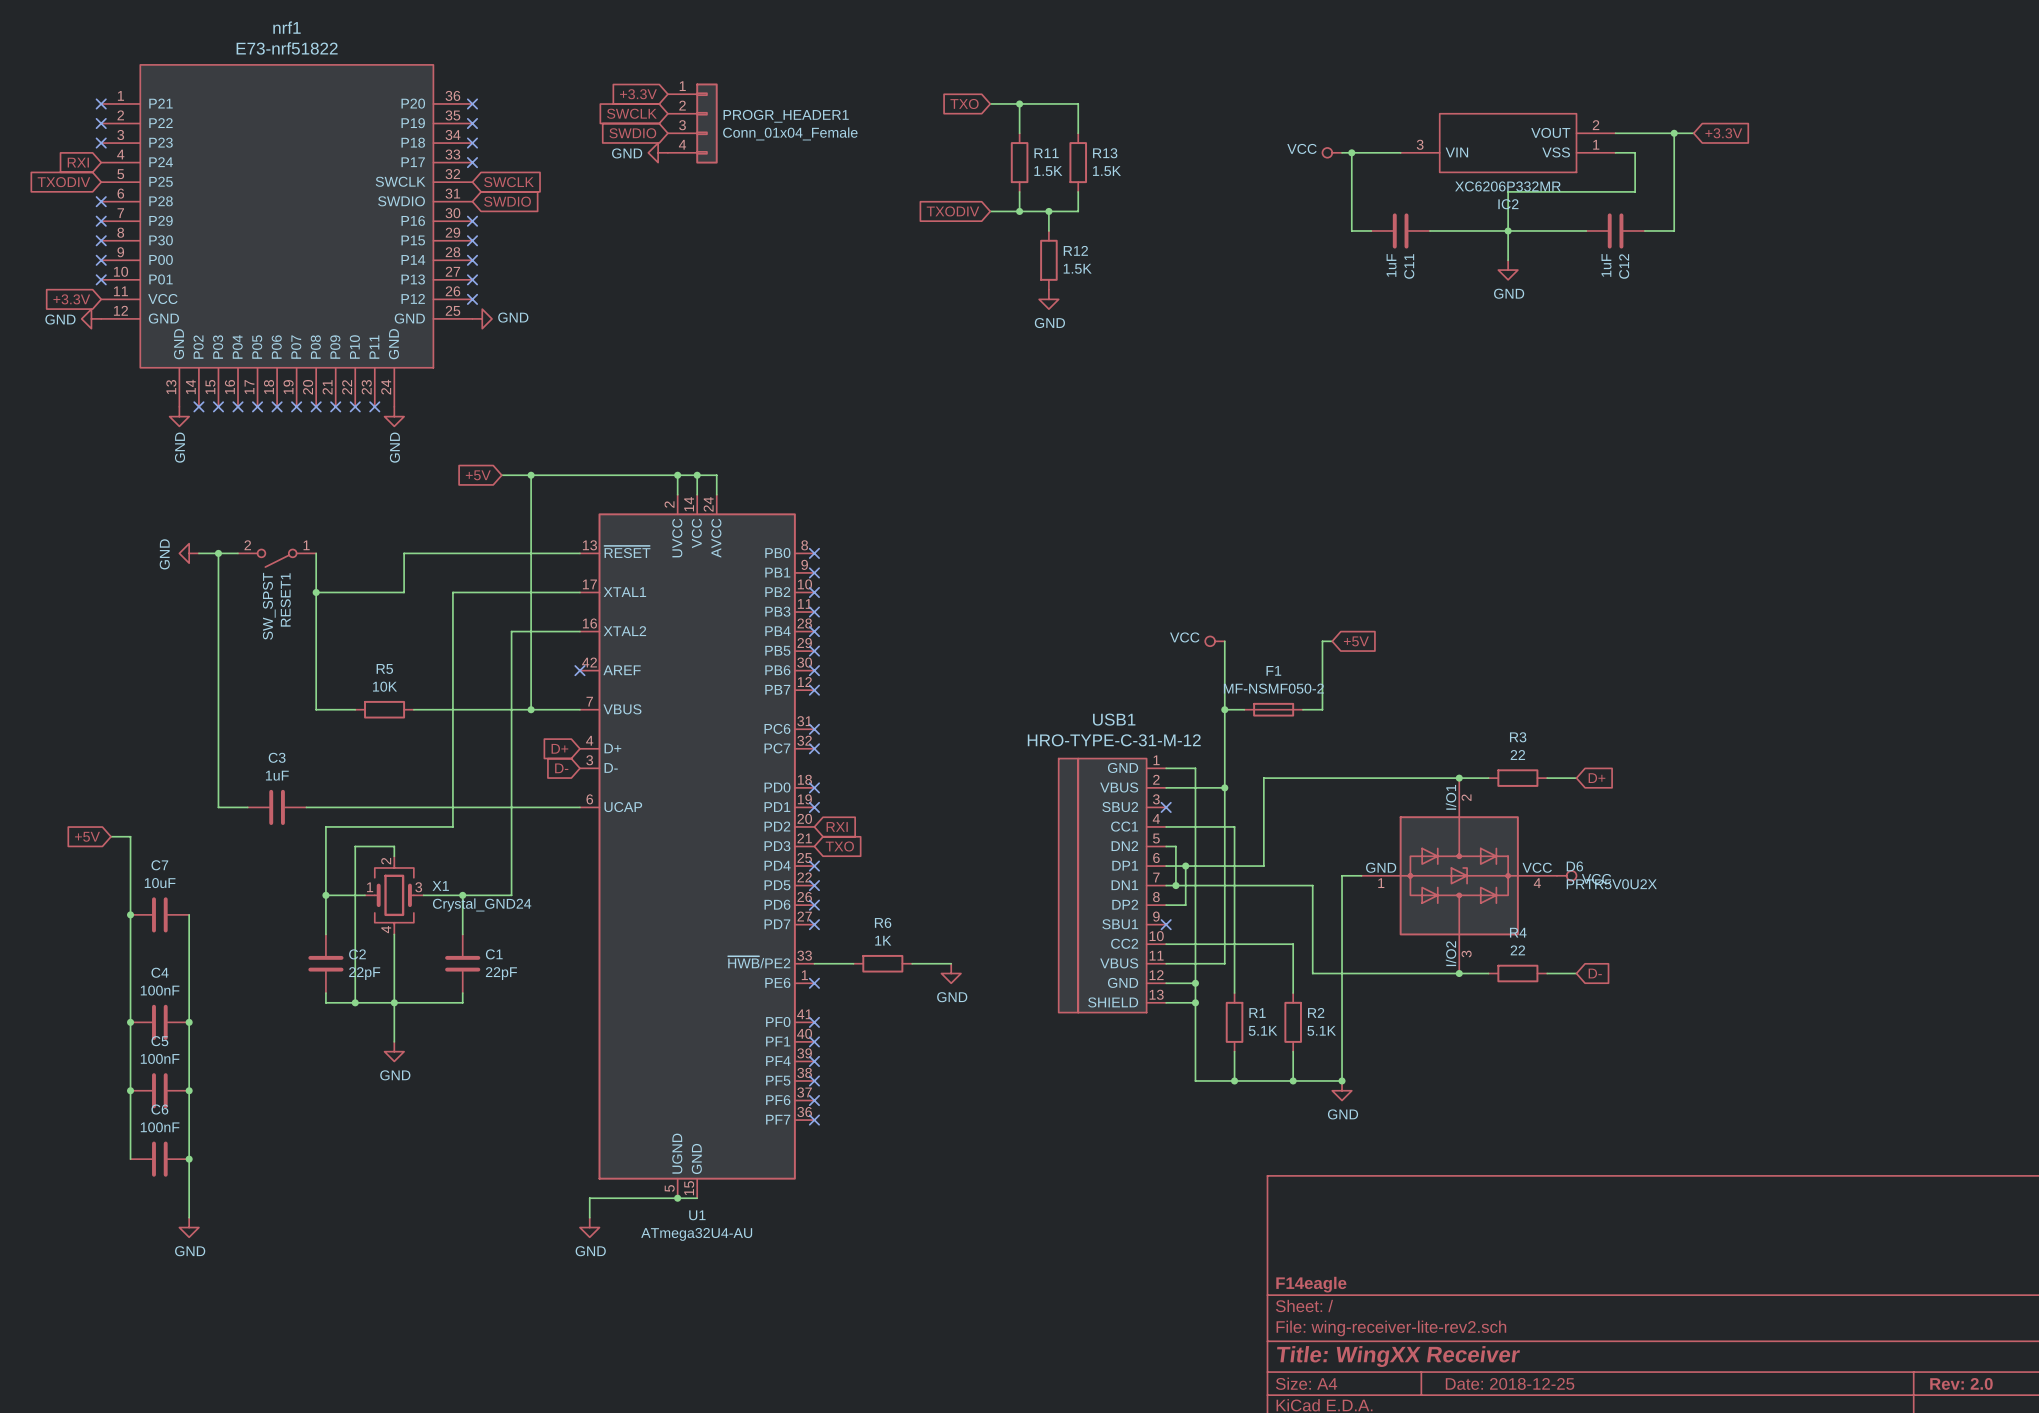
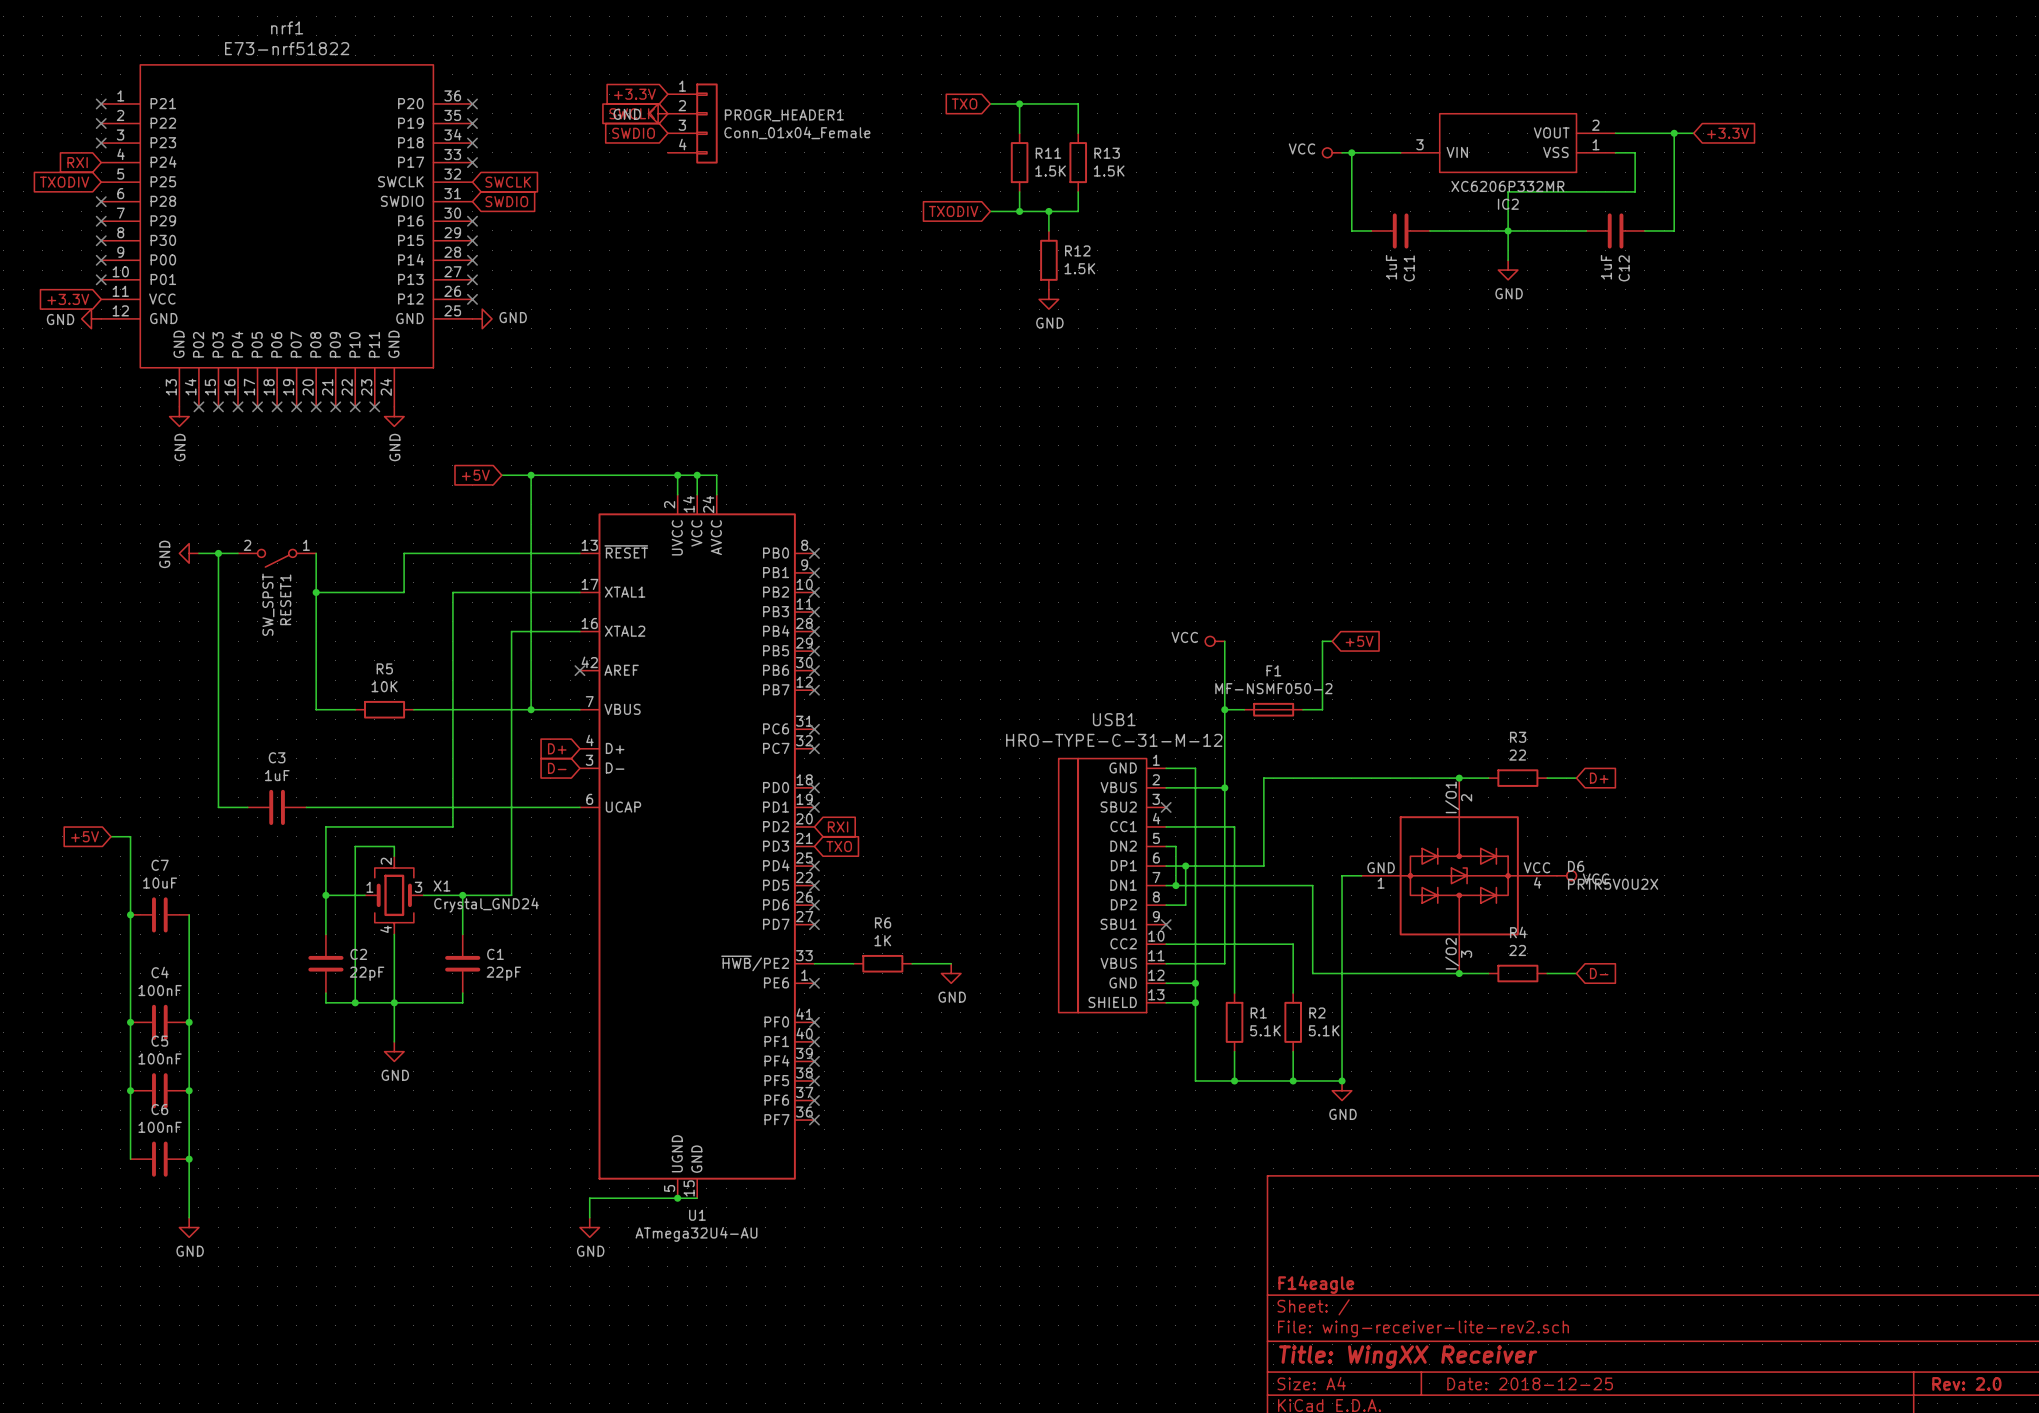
power symbol position: GND (658, 152) -> GND (658, 113)

